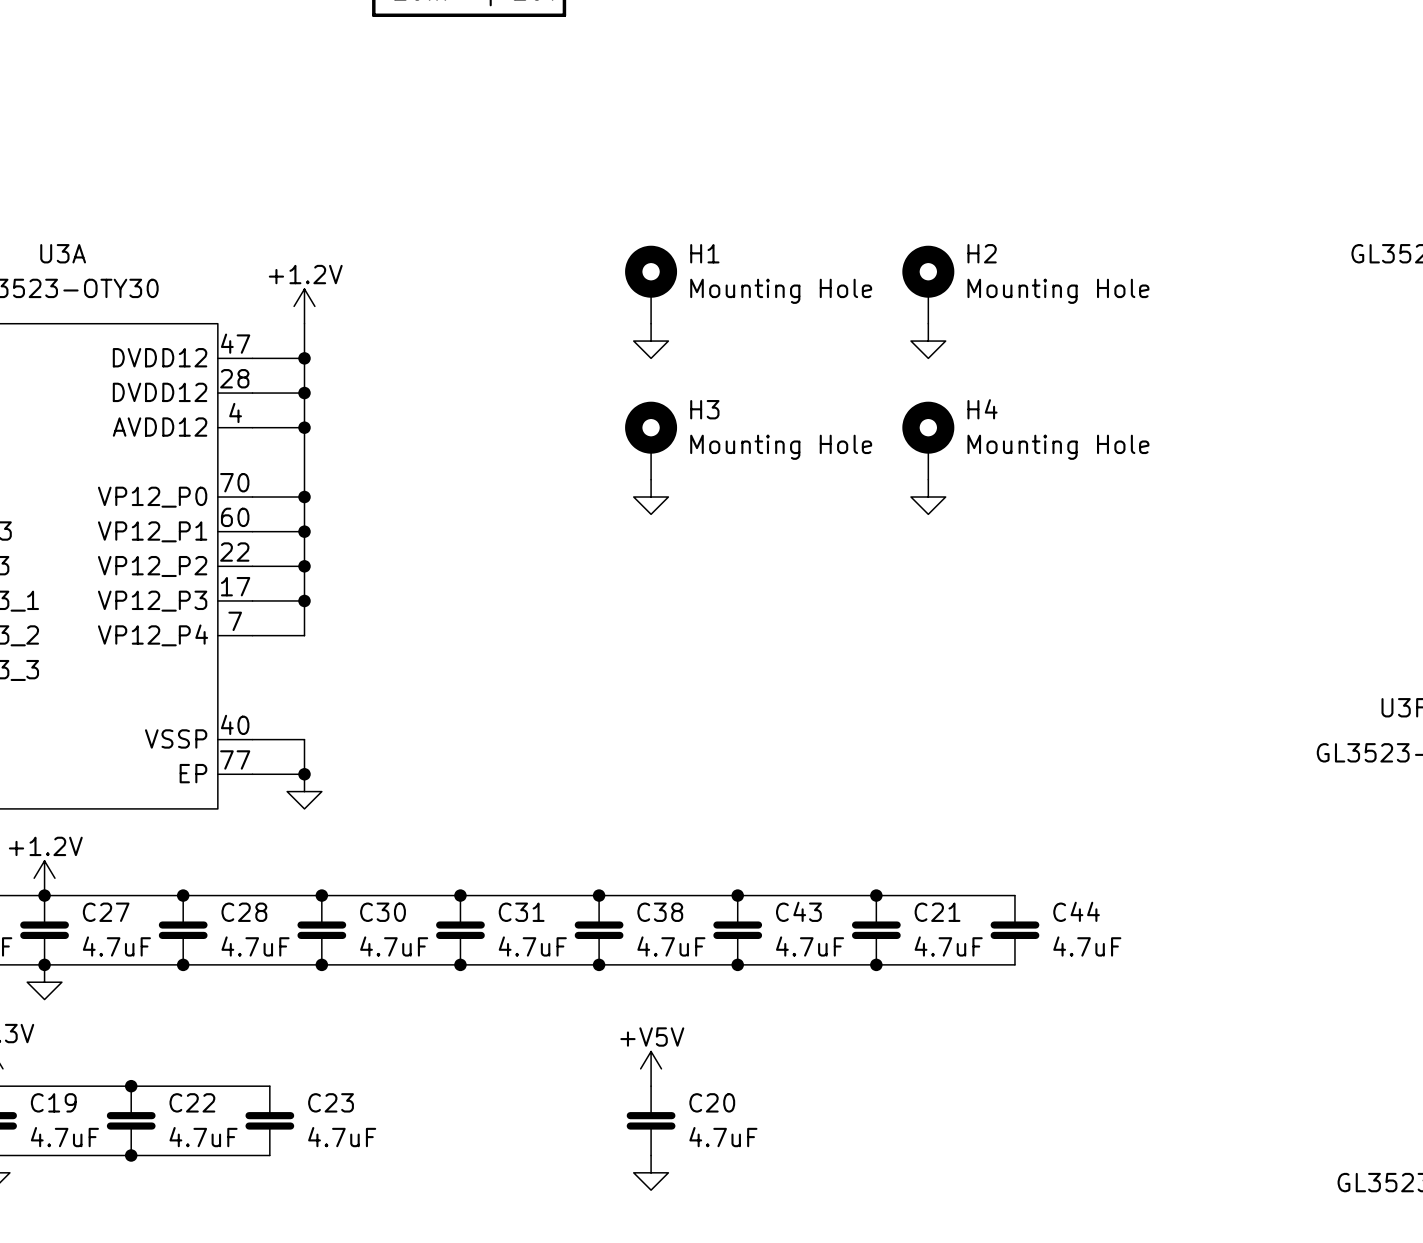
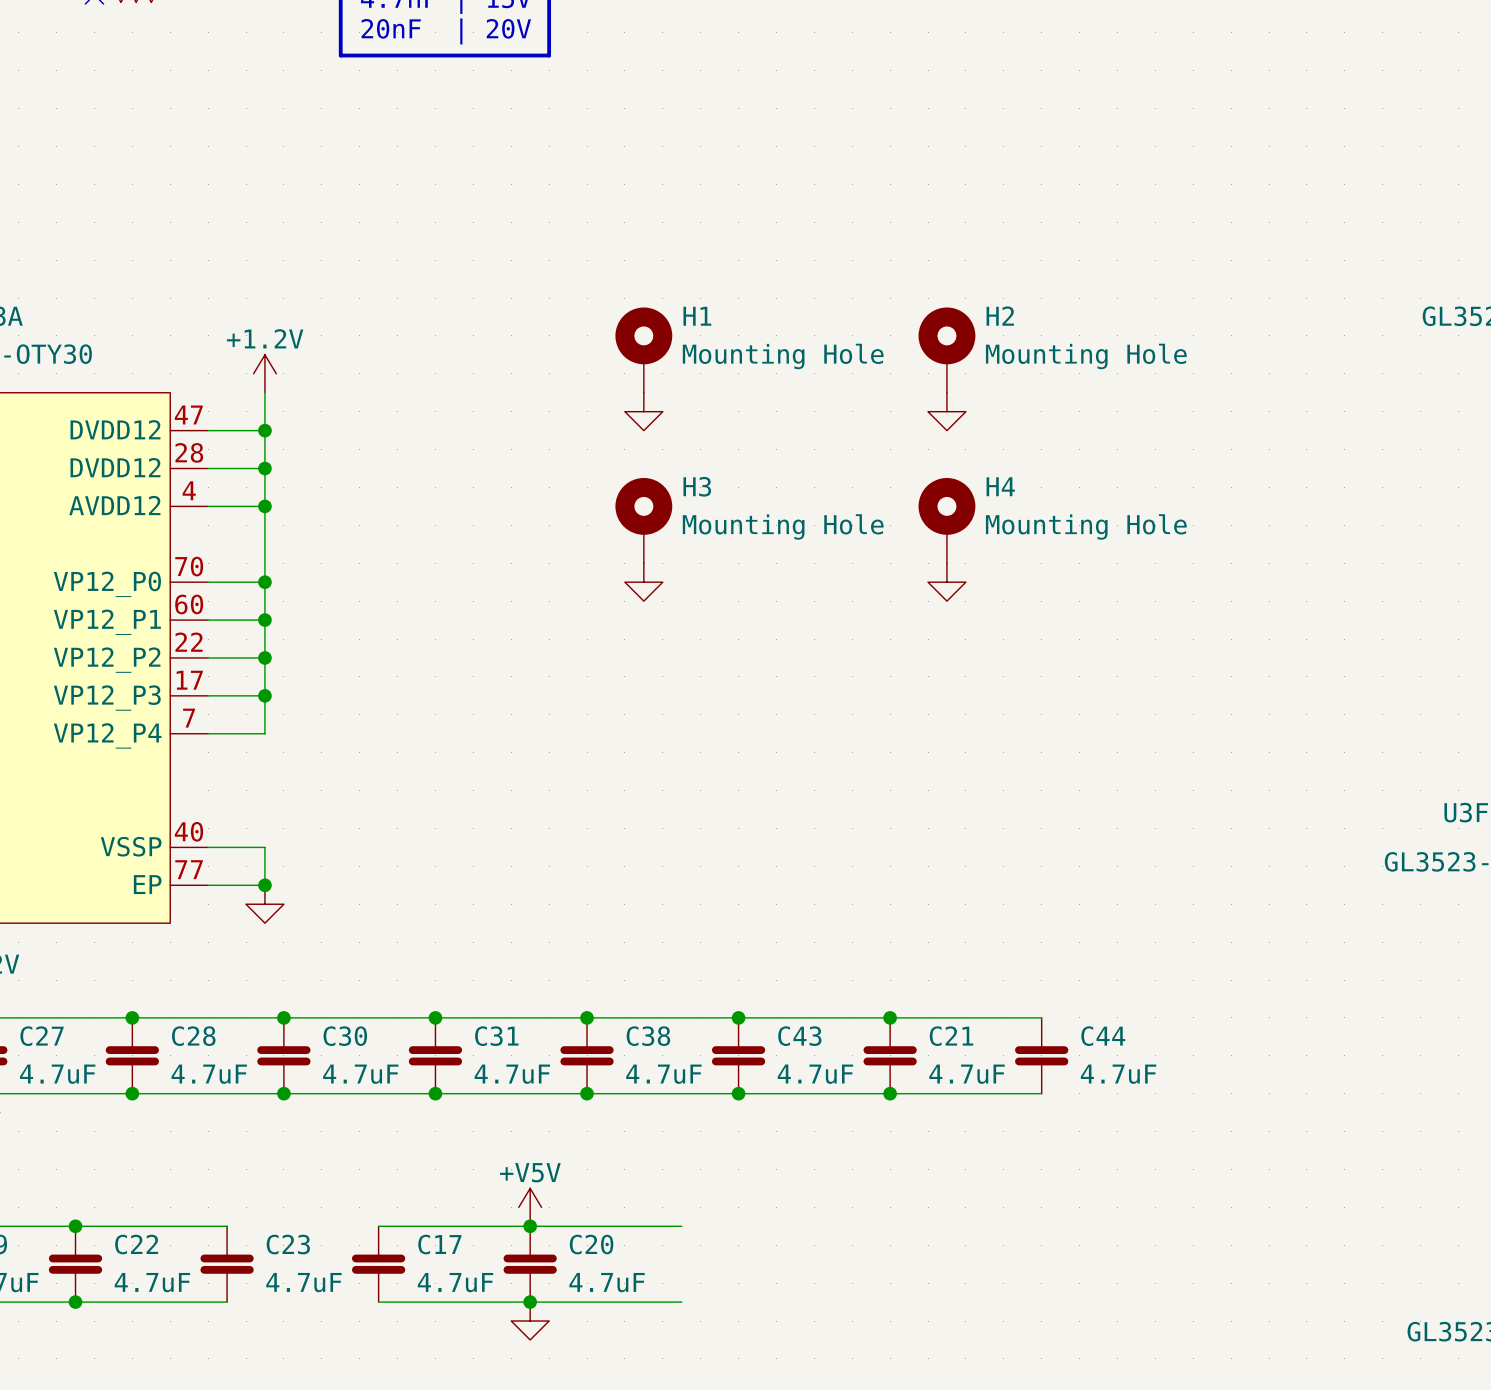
power symbol position: +V5V (651, 1068) -> +V5V (530, 1207)
wire: none -> (378, 1226) (681, 1226)
junction: none -> (530, 1226)
C17: none -> (378, 1264)
C20 position: (651, 1120) -> (530, 1264)
wire: none -> (378, 1302) (681, 1302)
junction: none -> (530, 1302)
power symbol position: (651, 1172) -> (530, 1321)

